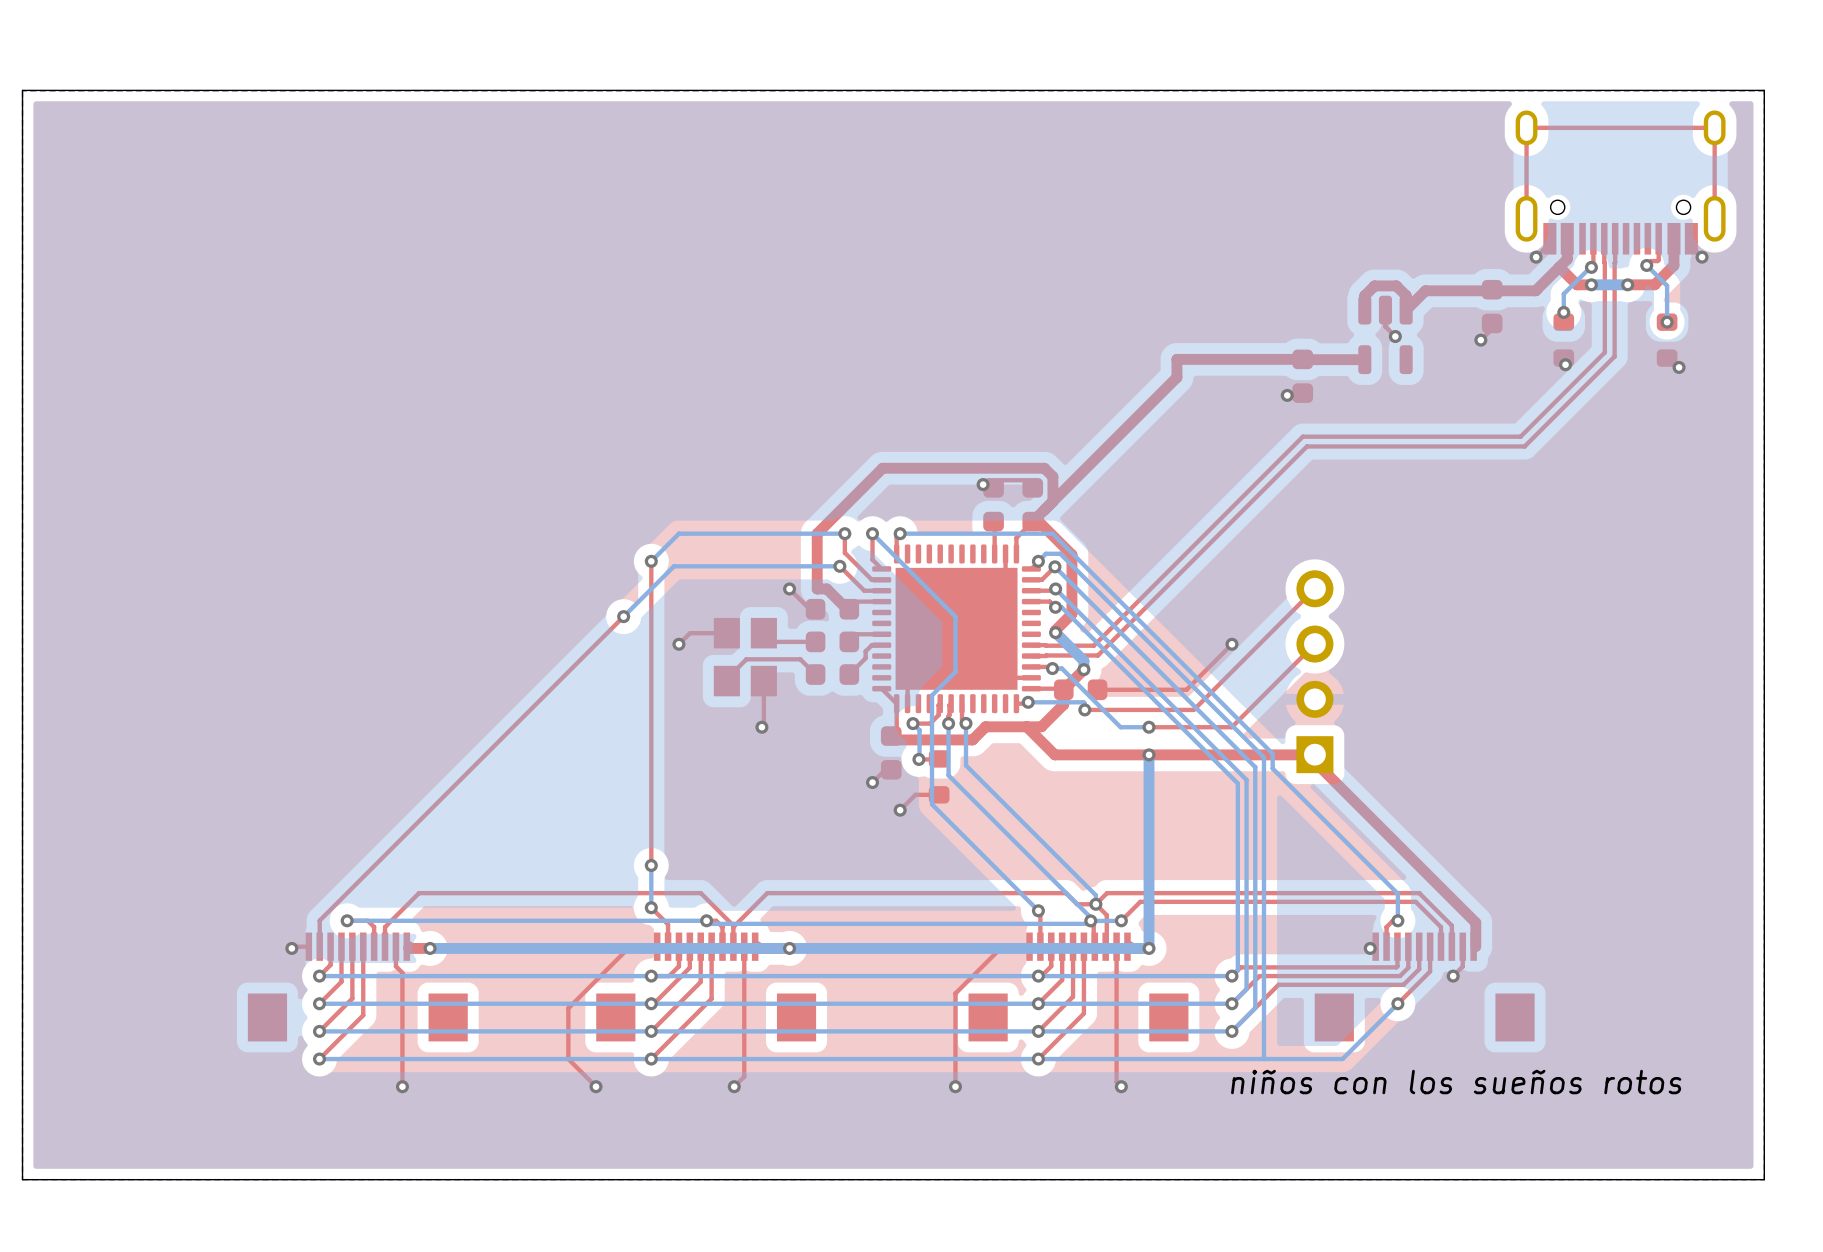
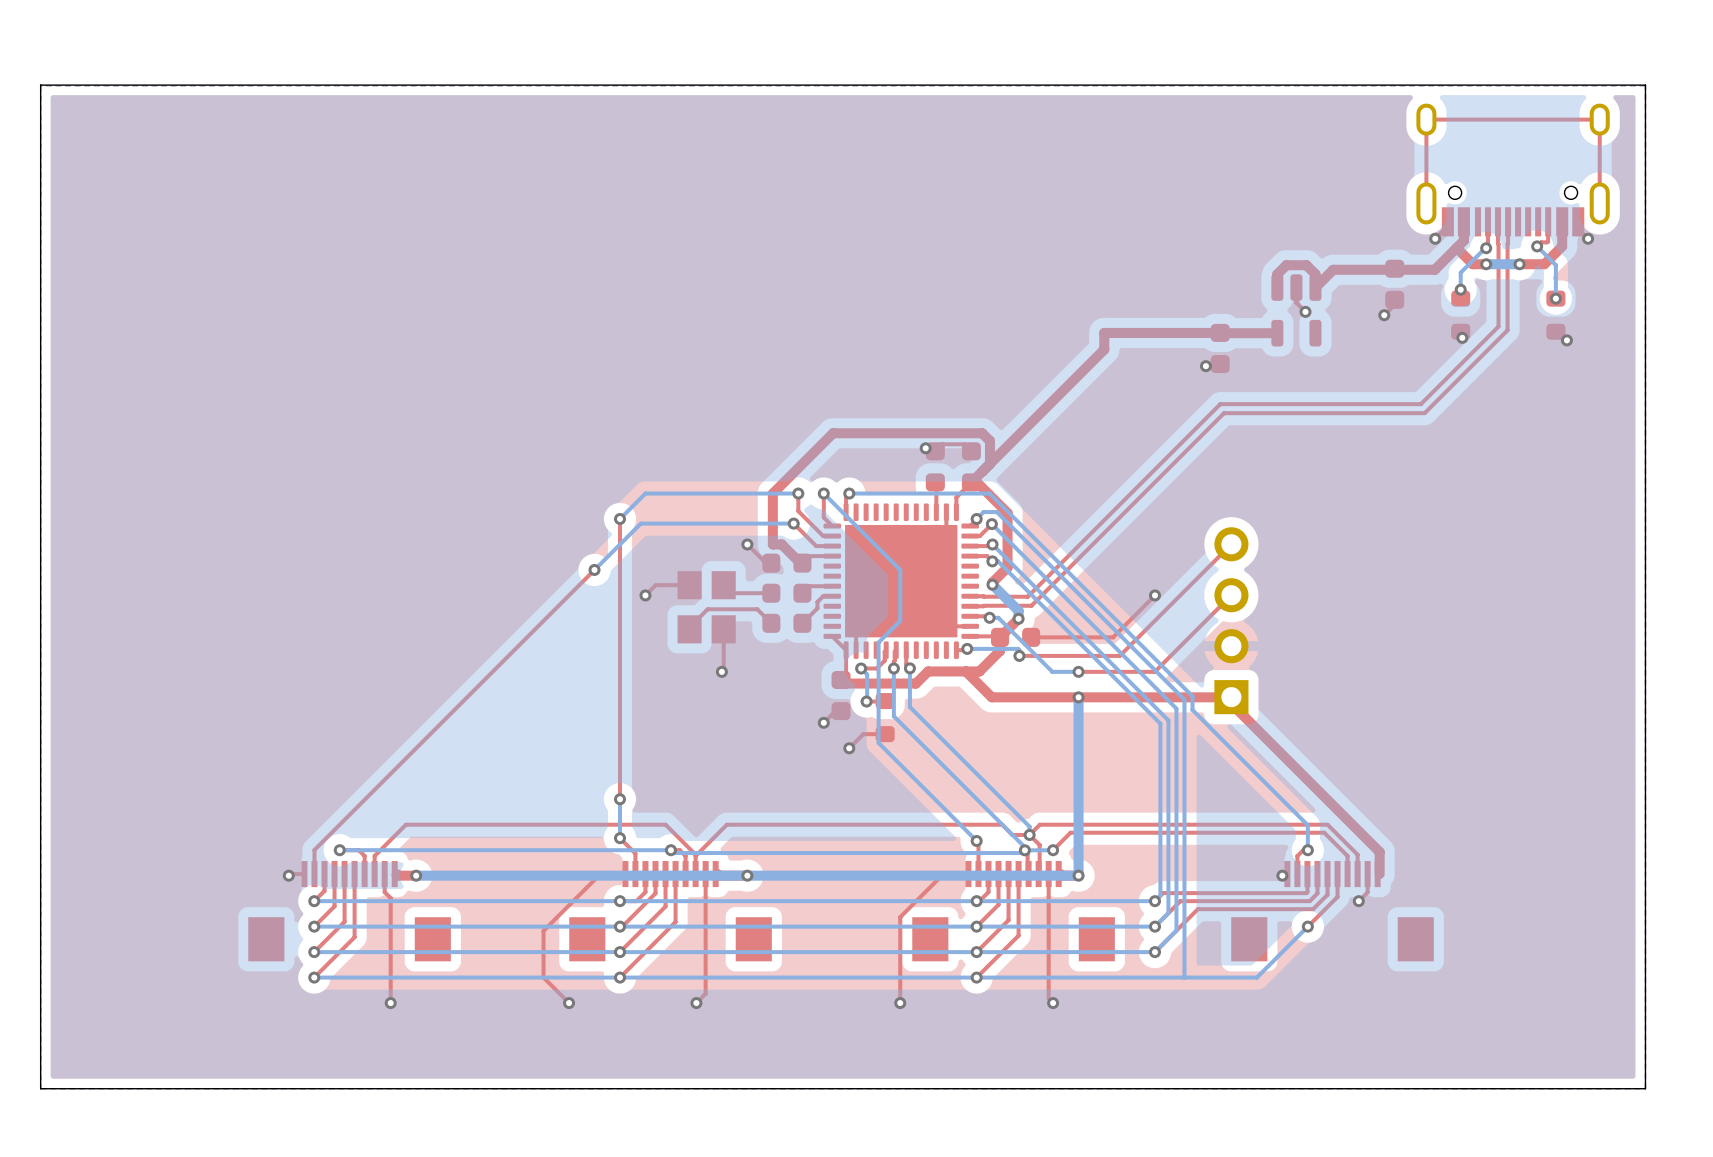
text: niños con los sueños rotos (1456, 1082) -> none

